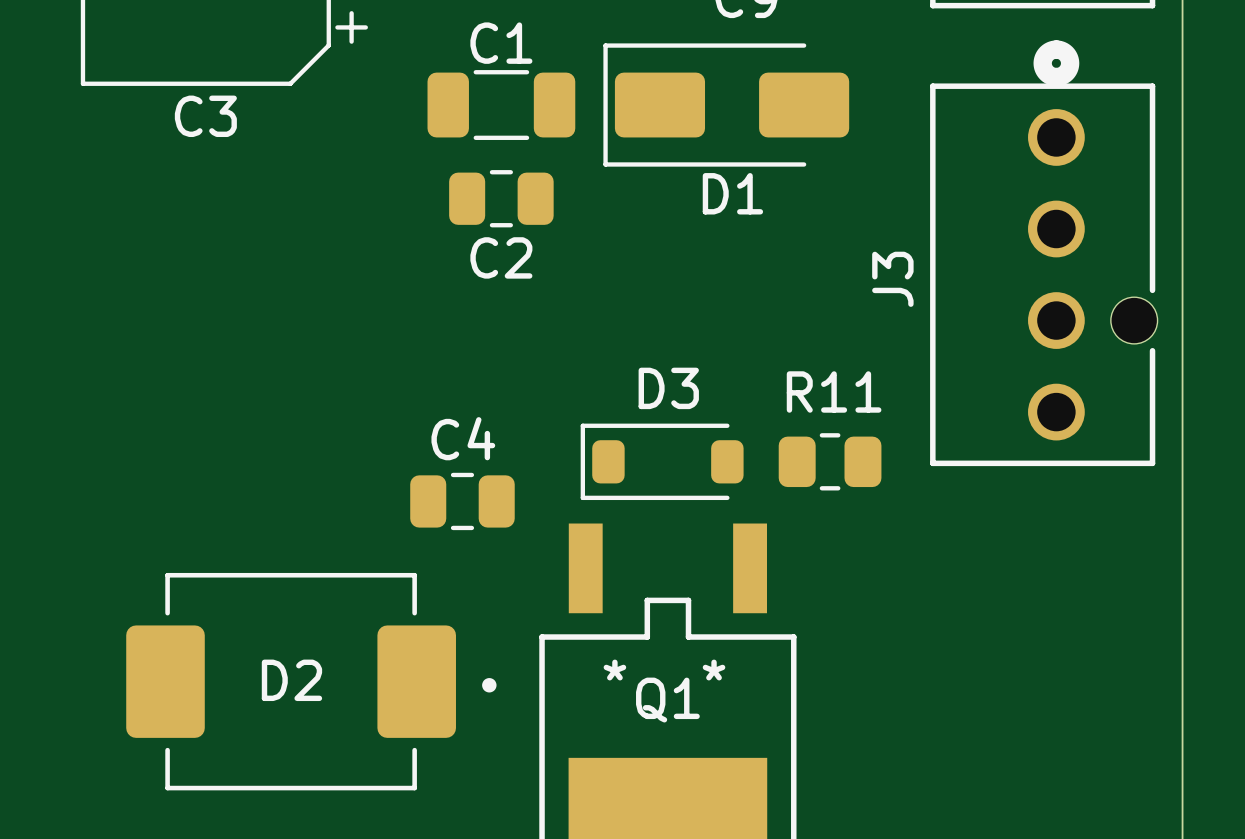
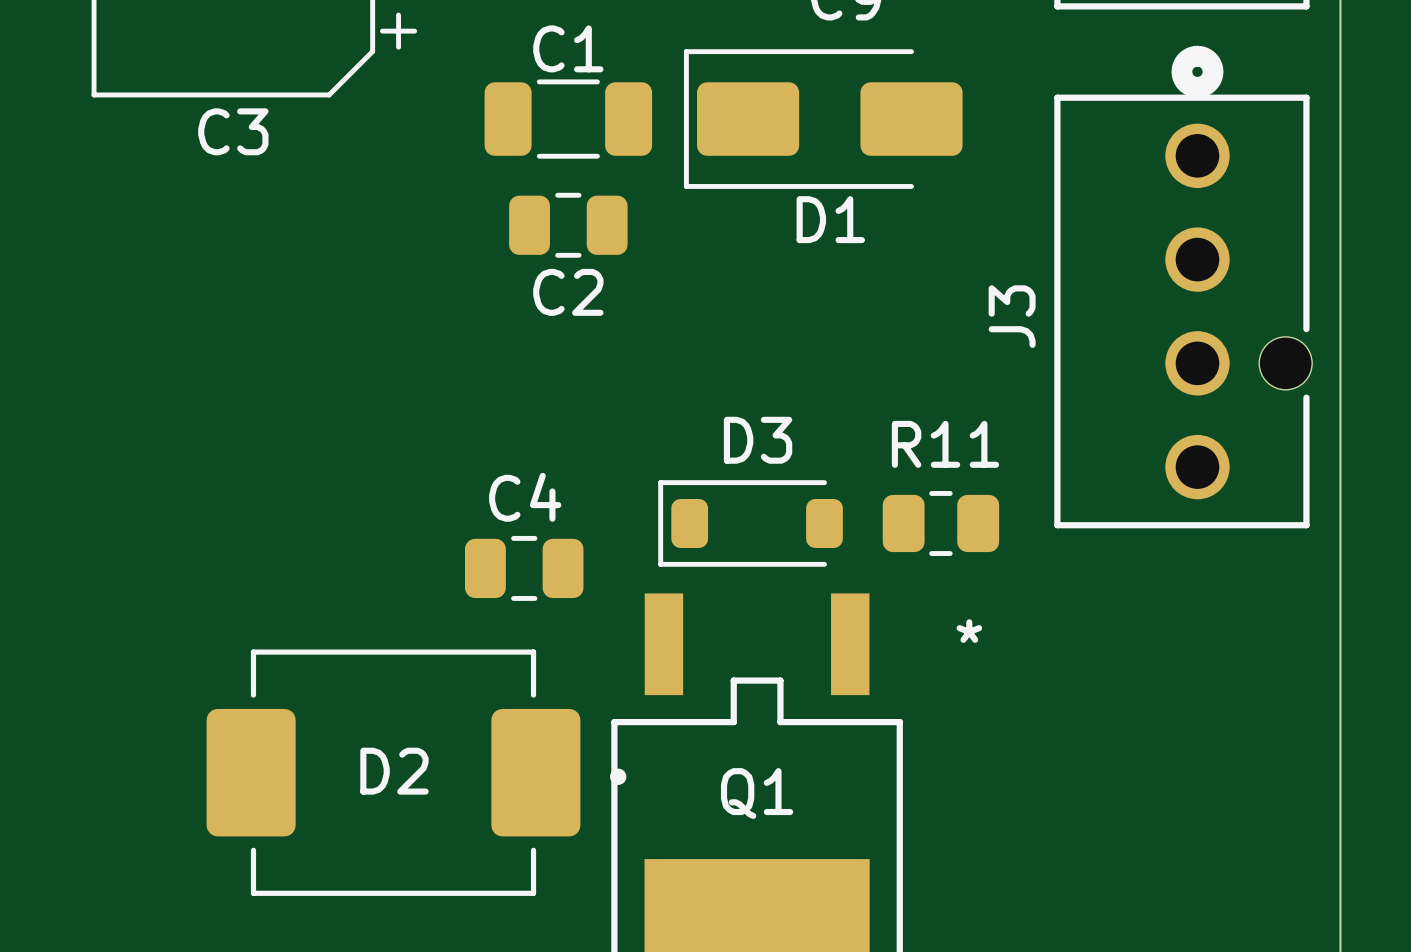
Q1 text position: * (614, 670) -> * (969, 631)
Q1 text: * (714, 670) -> none
D2 position: (311, 681) -> (416, 772)

